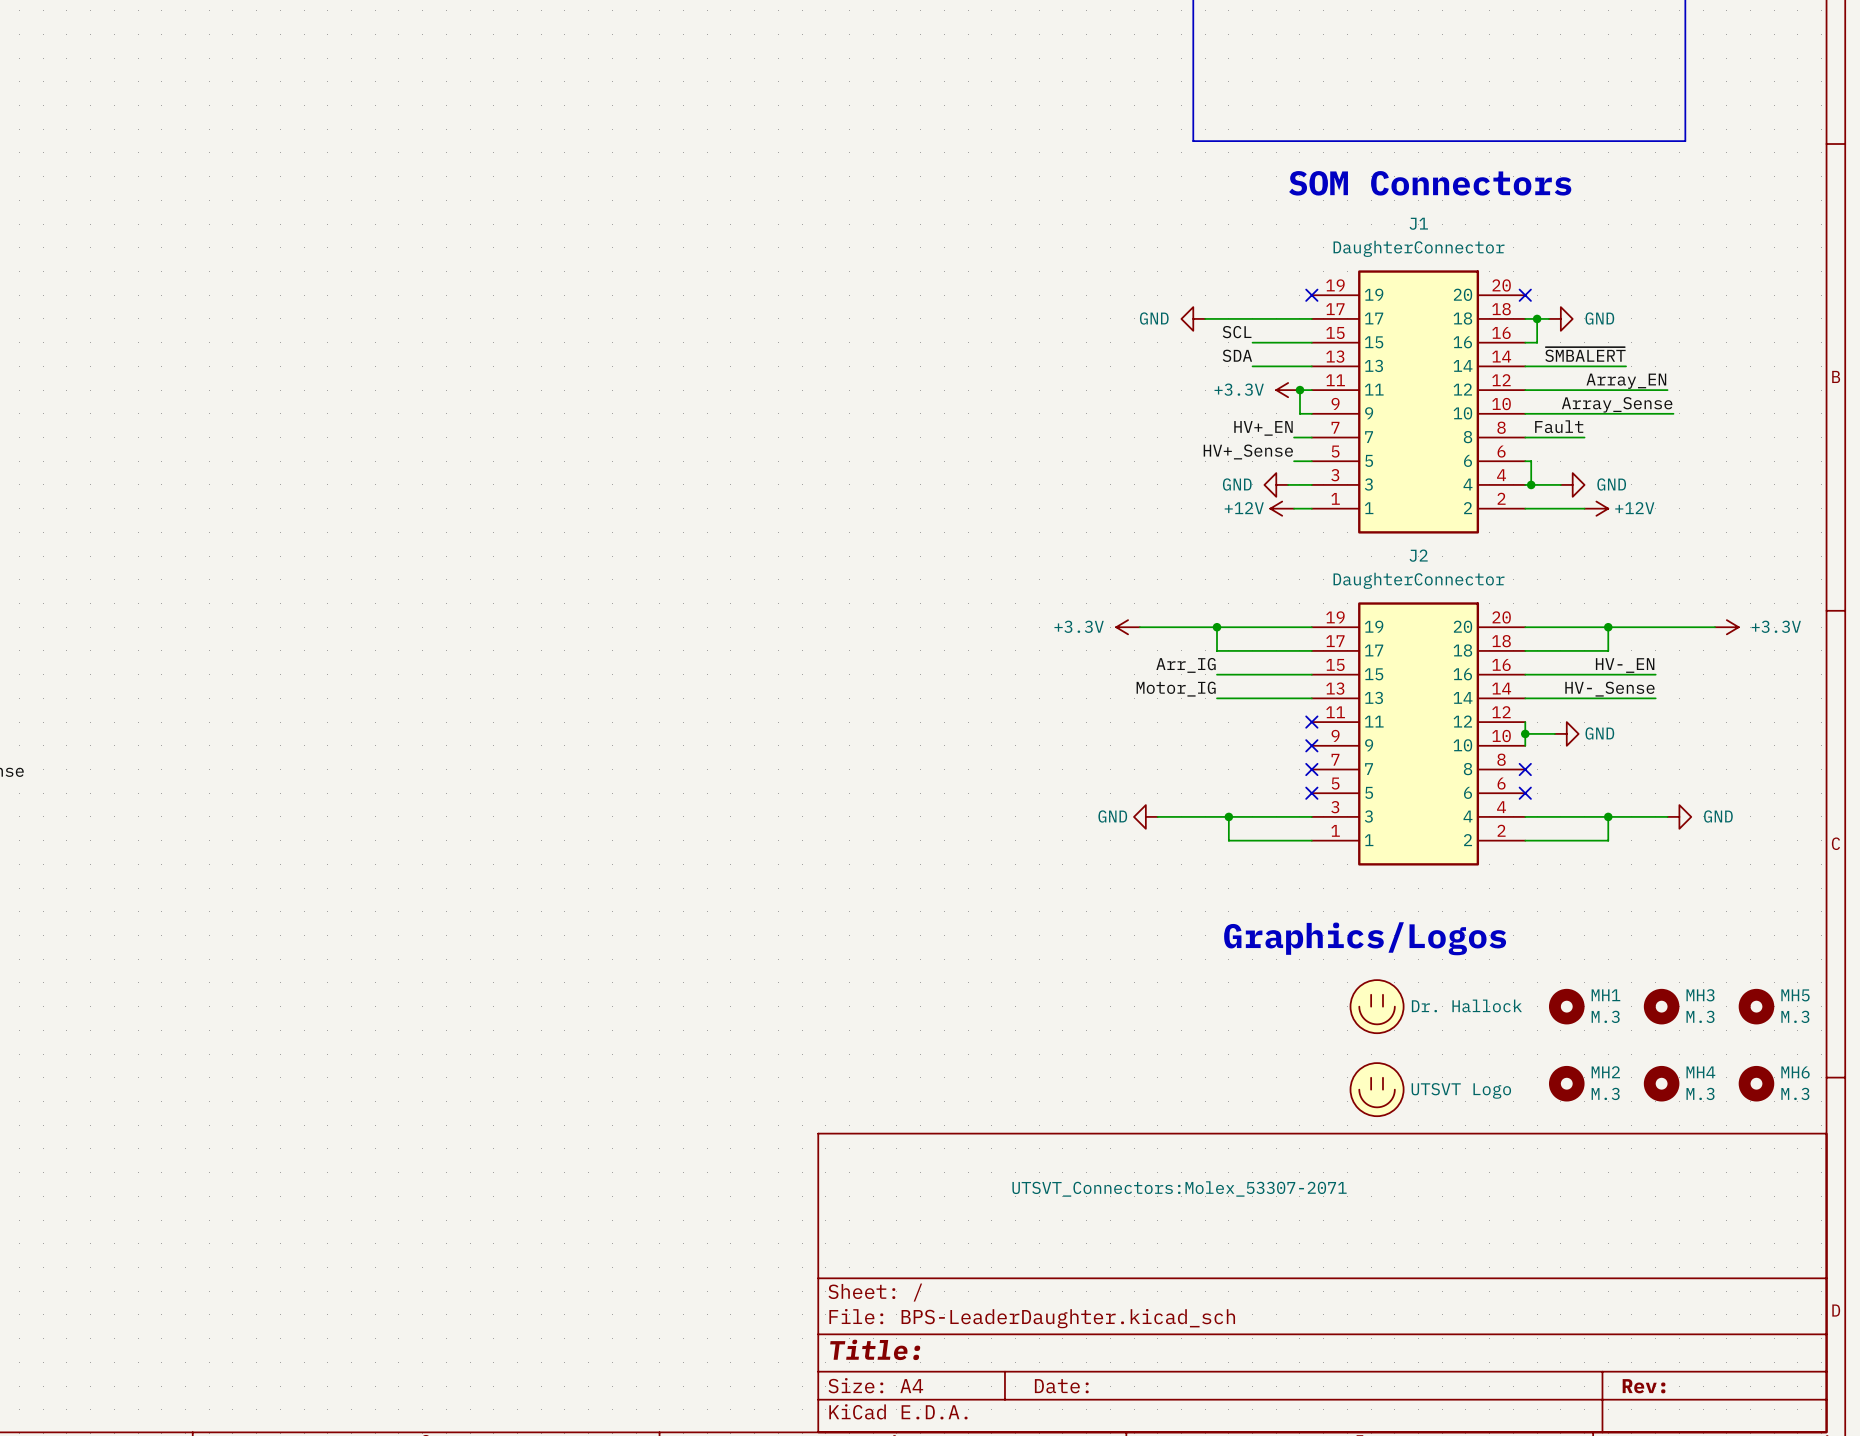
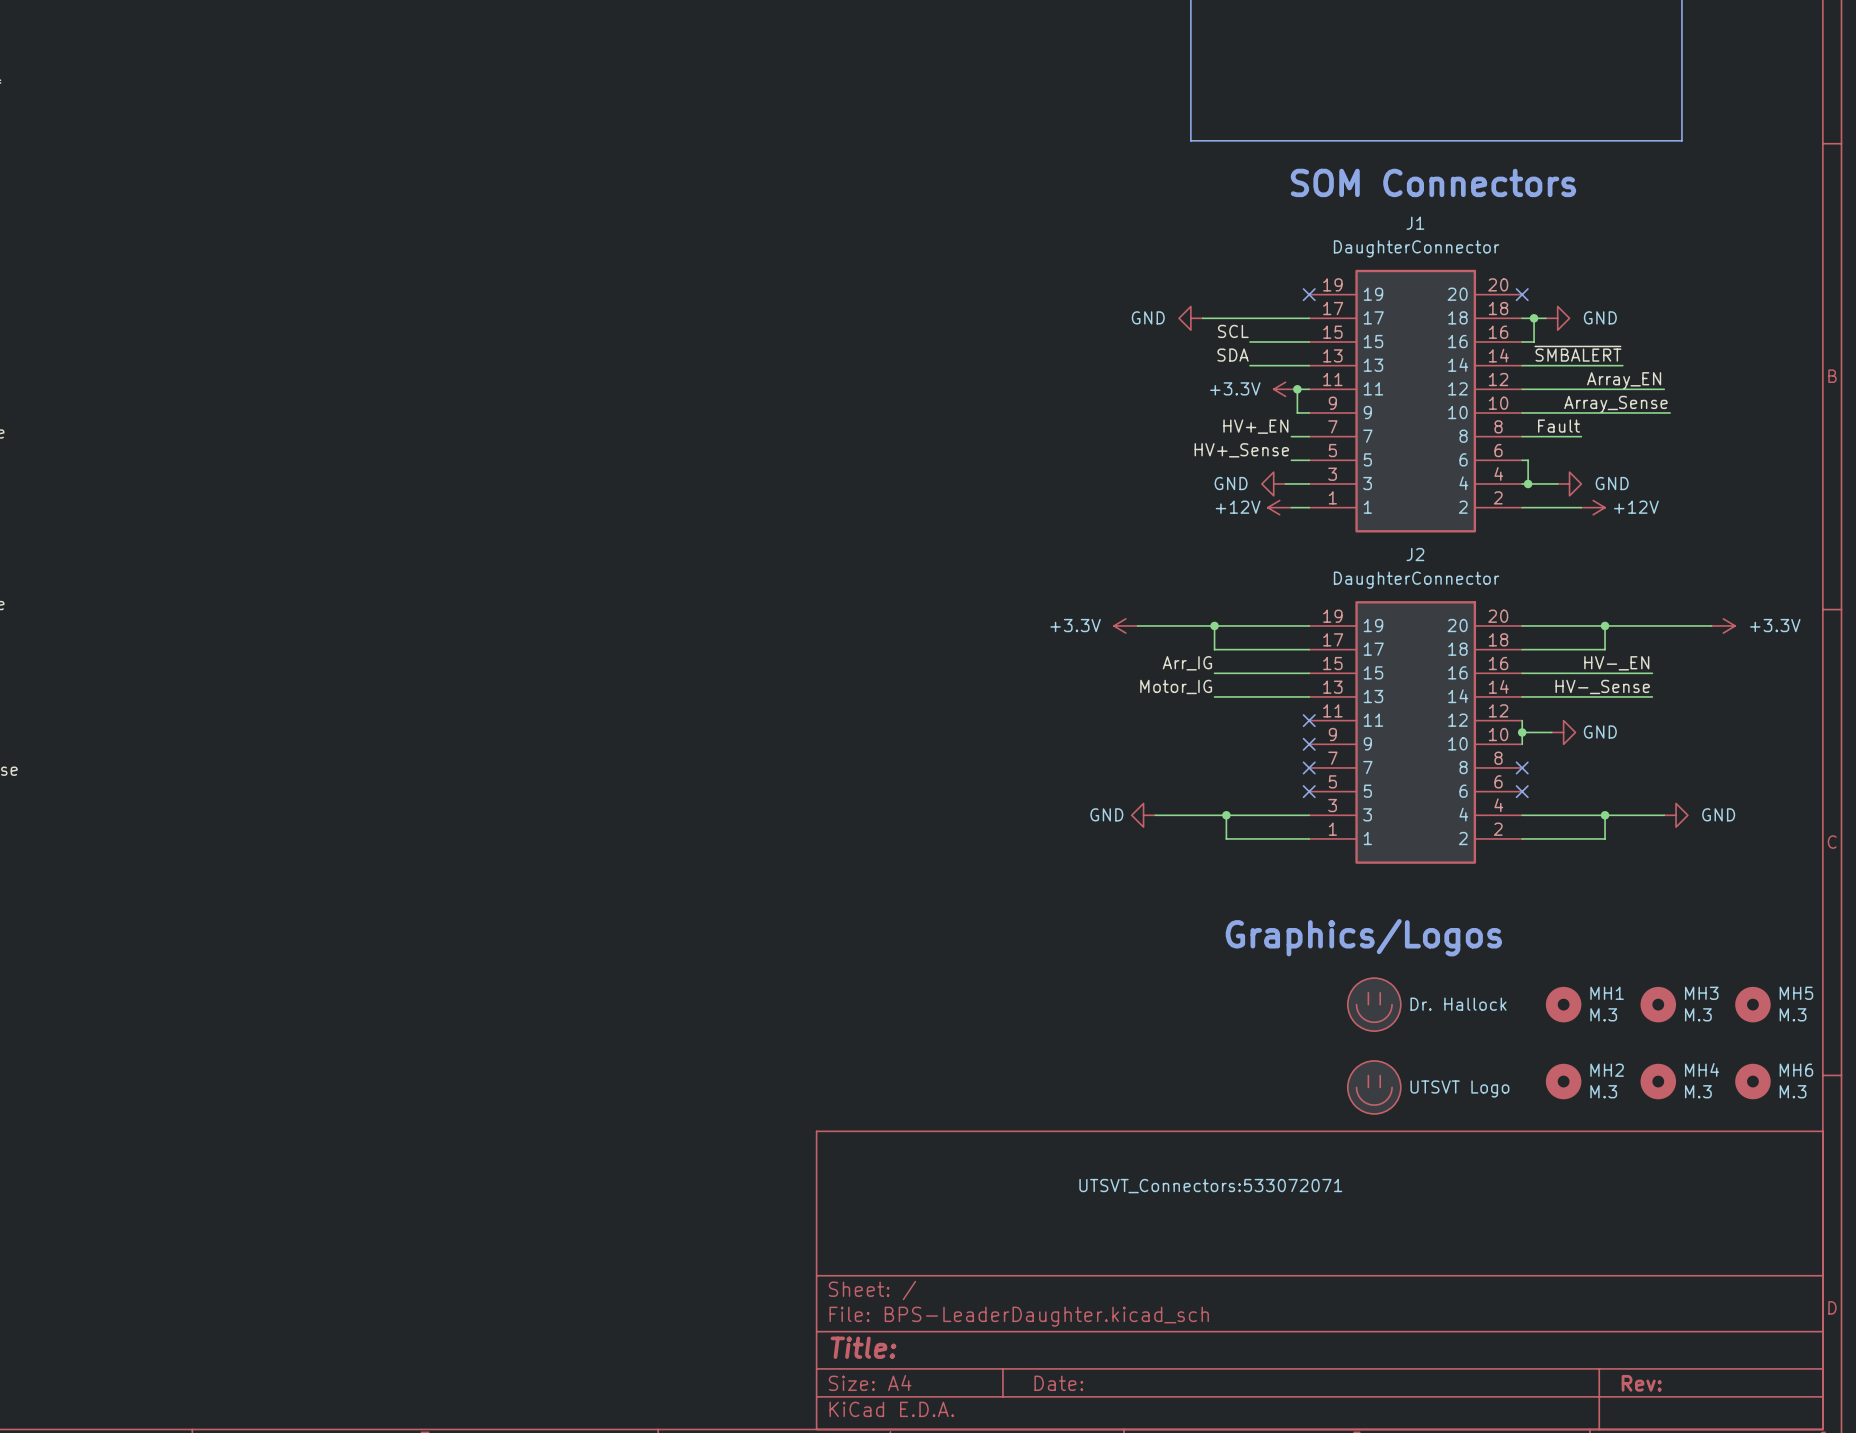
J1 text: UTSVT_Connectors:Molex_53307-2071 (1179, 1188) -> UTSVT_Connectors:533072071 (1210, 1186)

